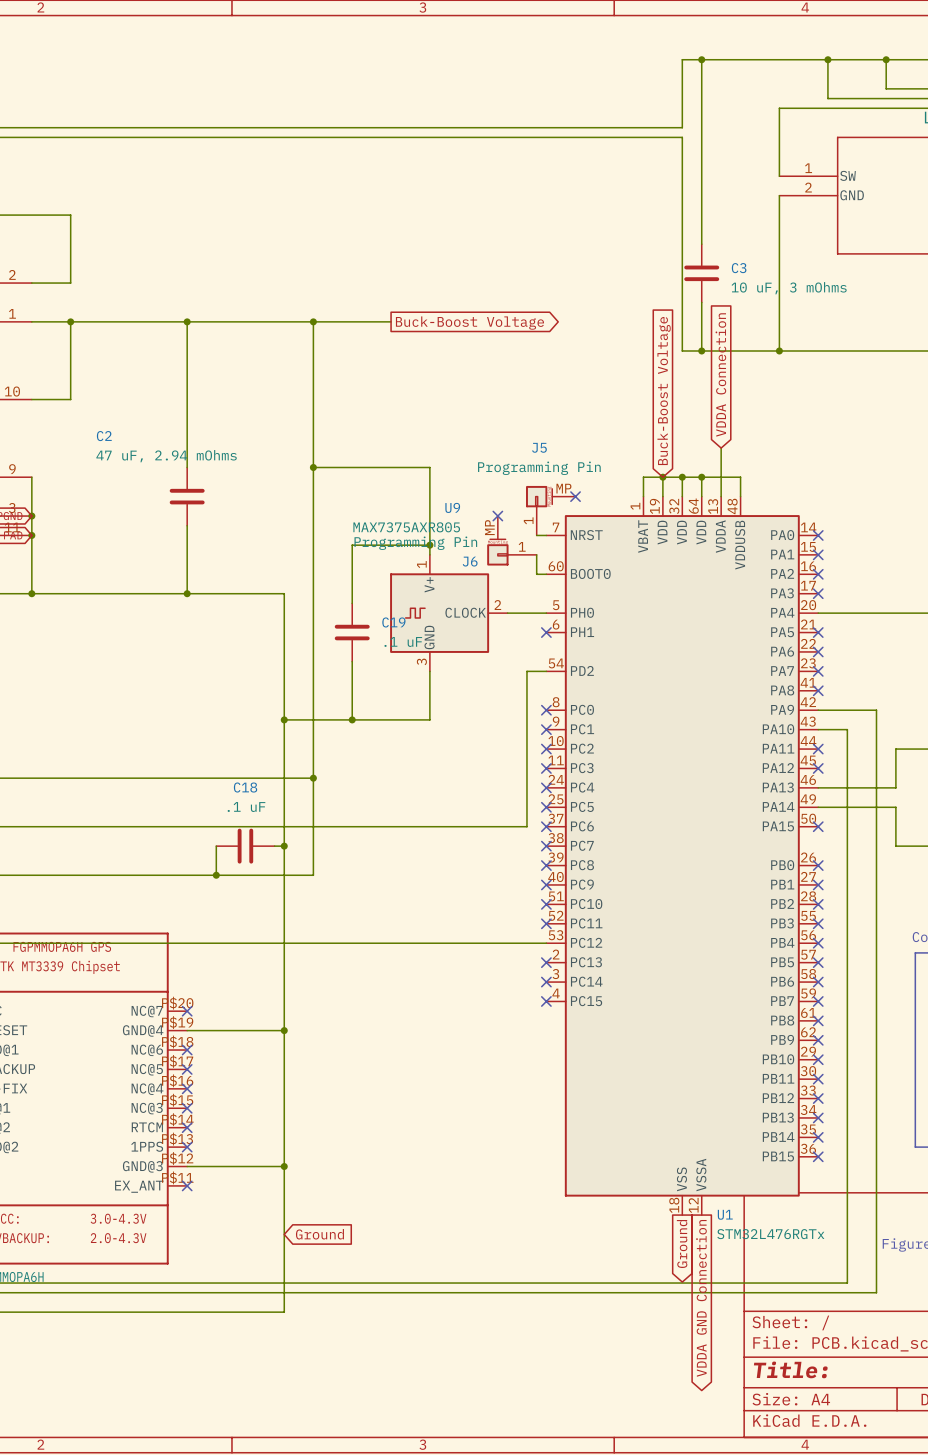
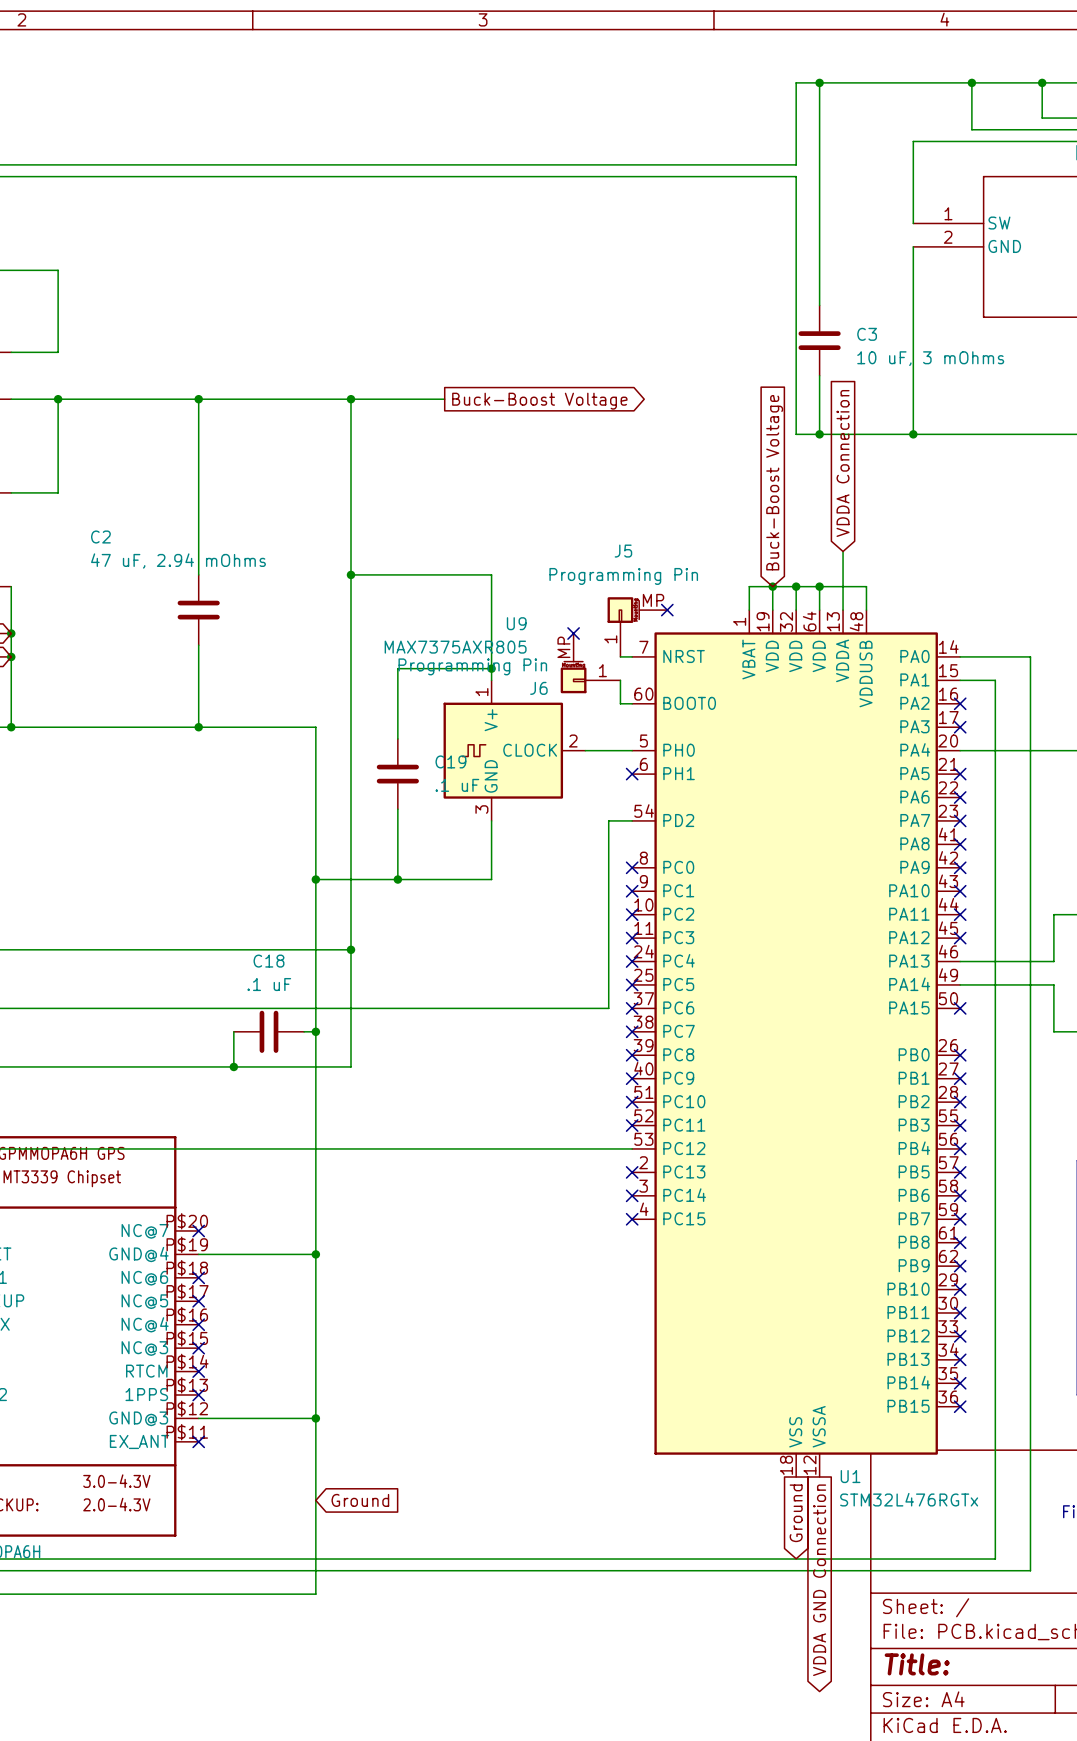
no-connect mark: (818, 535) -> none
no-connect mark: (818, 554) -> none
wire: (818, 710) (876, 710) -> (960, 656) (1030, 656) (1030, 867)
no-connect mark: none -> (960, 867)
wire: (818, 729) (847, 729) -> (960, 680) (995, 680) (995, 891)
no-connect mark: none -> (960, 891)

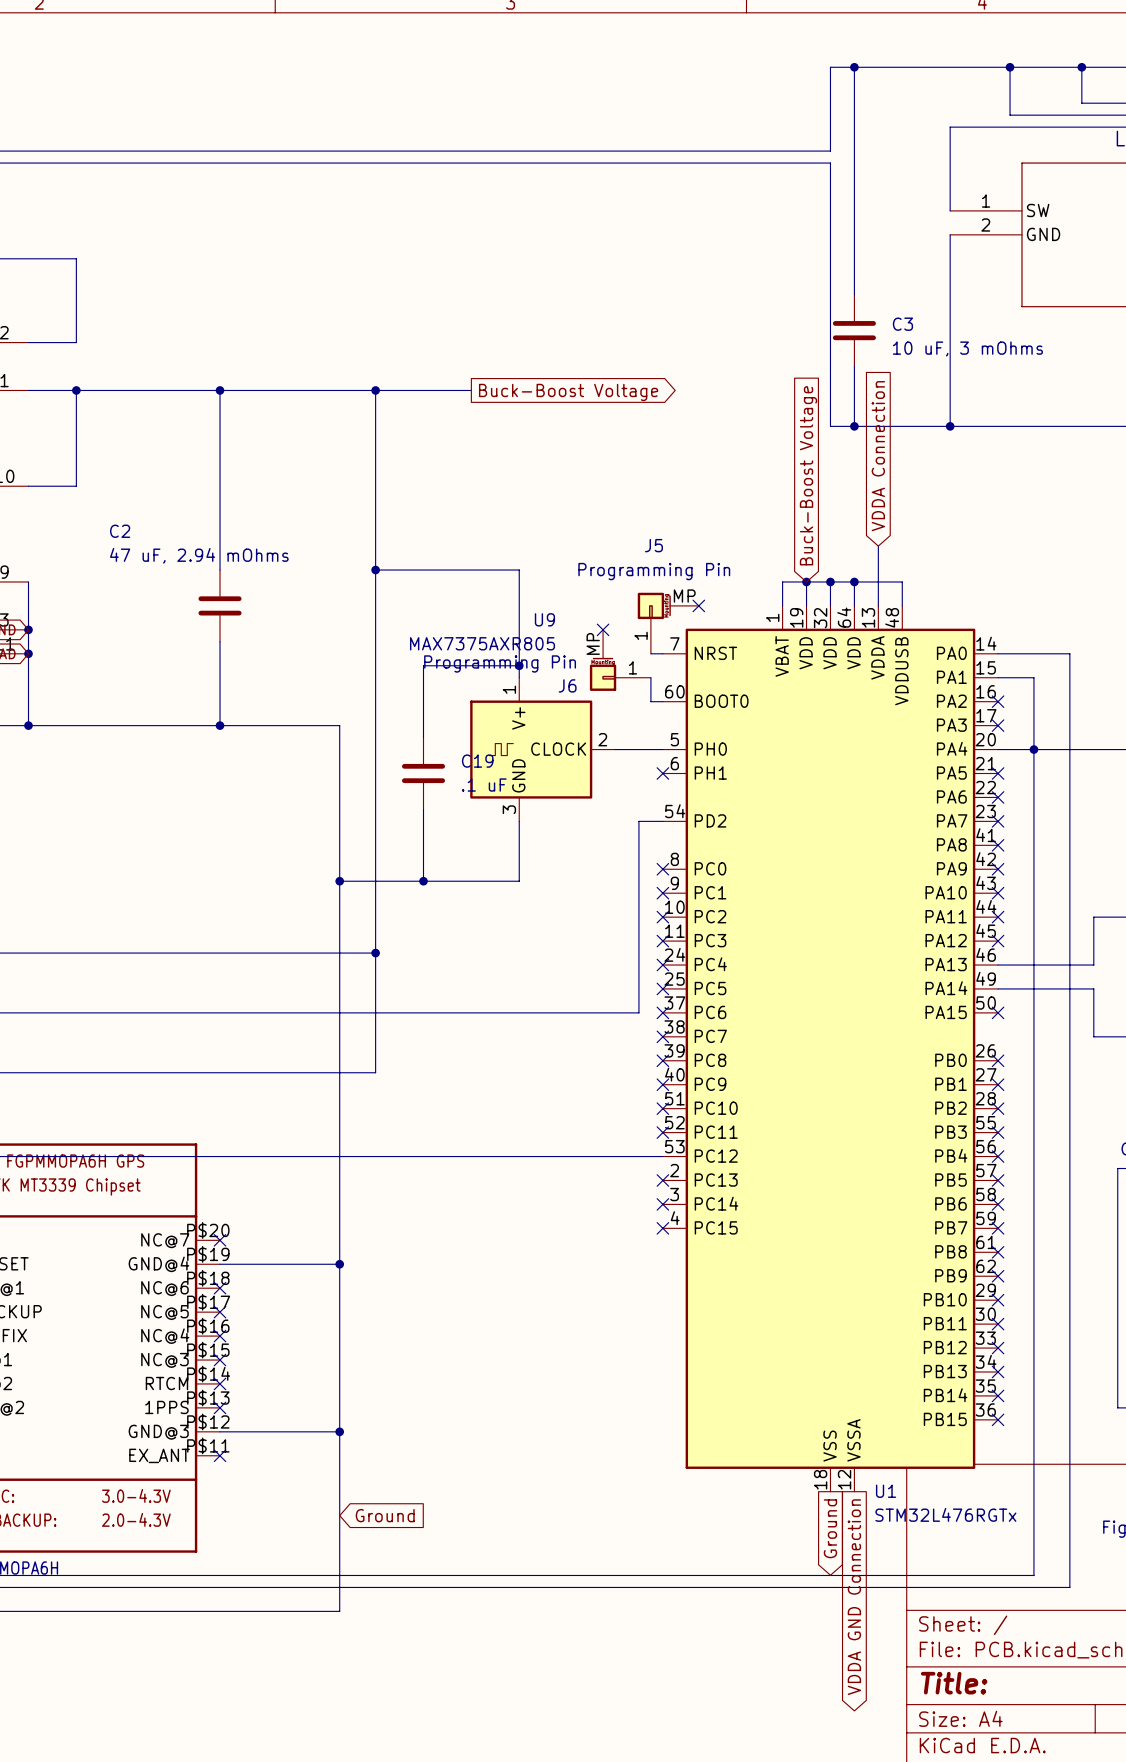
junction: none -> (1033, 749)
wire: (233, 1031) (233, 1066) -> none
C18: .1 uF (268, 1031) -> none
wire: (304, 1031) (315, 1031) -> none
junction: (315, 1031) -> none
junction: (233, 1066) -> none

